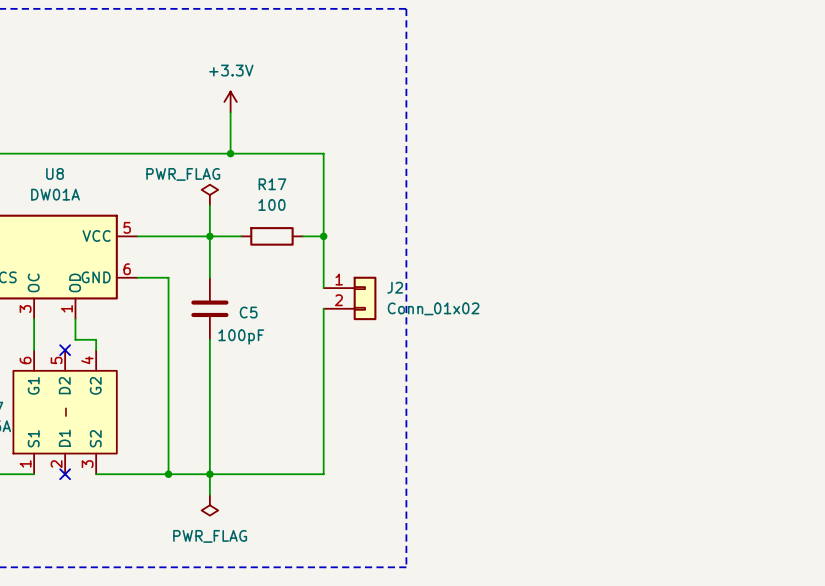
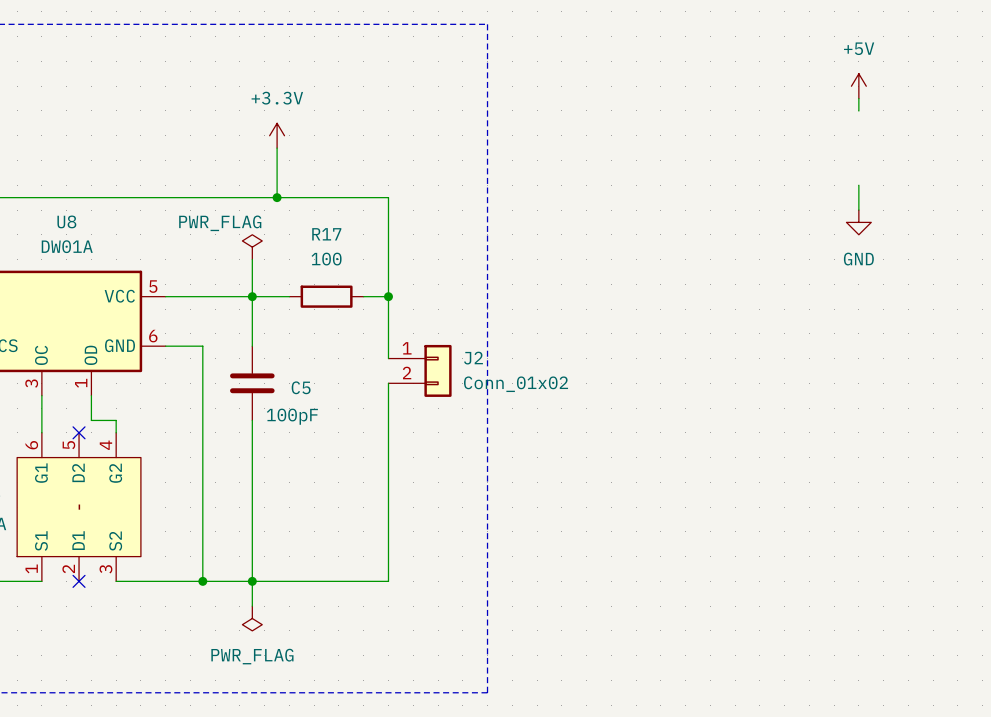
power symbol: none -> +5V (858, 86)
wire: none -> (858, 98) (858, 110)
wire: none -> (858, 185) (858, 210)
power symbol: none -> GND (858, 222)

